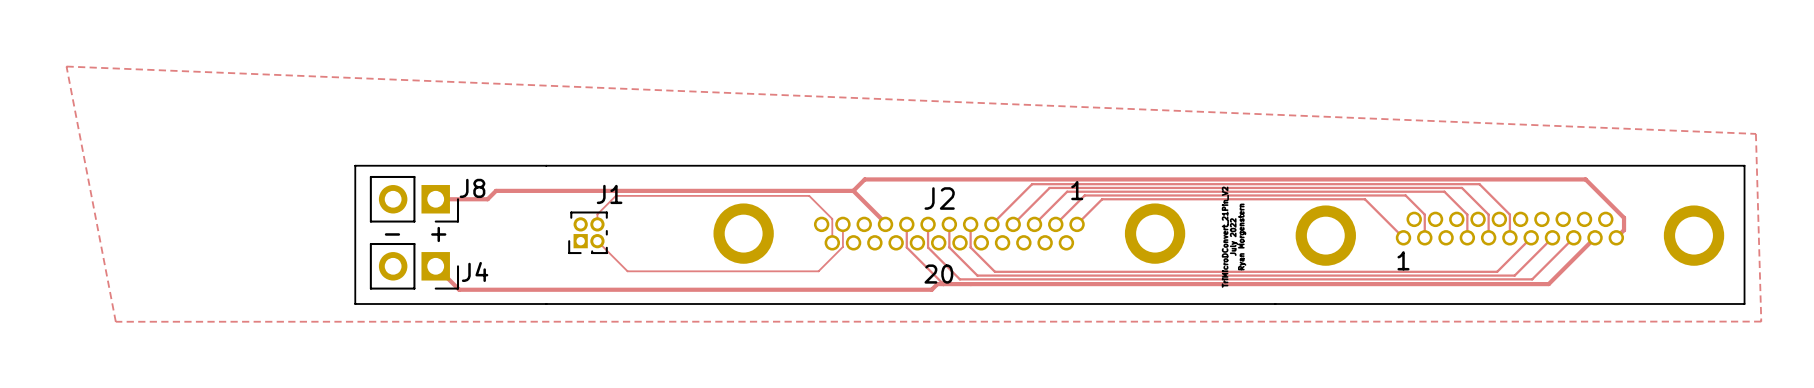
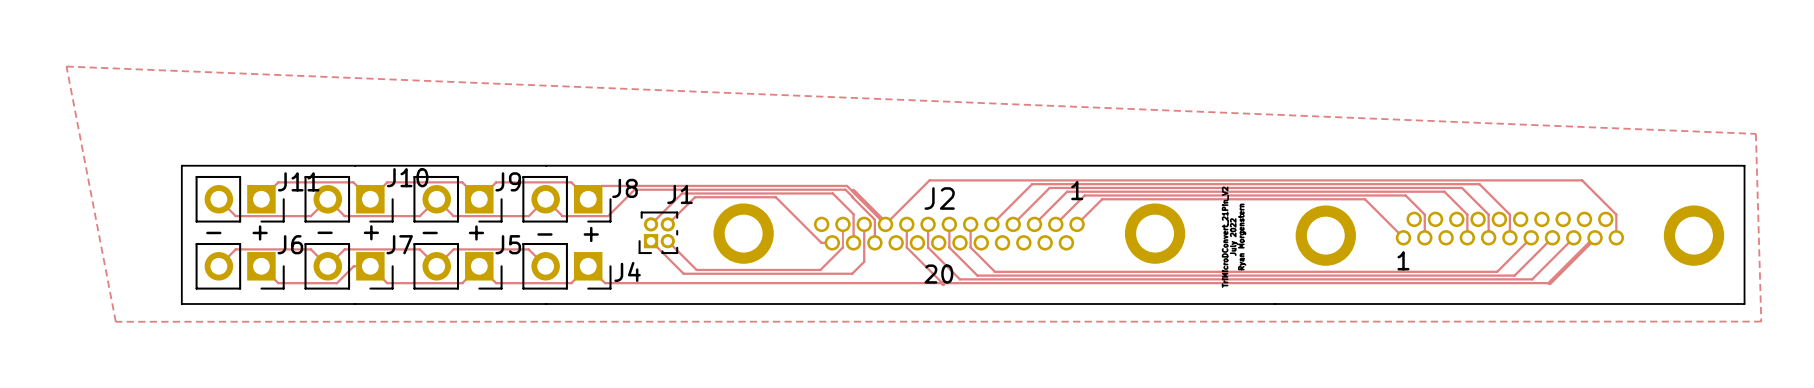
board edge: (355, 165) (355, 303) -> (355, 165) (181, 165) (181, 303) (355, 303)
track: none -> (218, 199) (235, 216) (310, 216) (327, 199) (344, 216) (419, 216) (436, 199) (453, 216) (528, 216) (545, 199) (562, 216) (608, 216) (634, 189) (845, 189) (874, 219) (874, 242)
J11: none -> (240, 199)
J10: none -> (349, 199)
J8 position: (414, 199) -> (566, 199)
track: (435, 199) (487, 199) (496, 190) (853, 190) (864, 179) (1585, 179) (1624, 217) (1624, 230) (1616, 237) -> (261, 199) (278, 182) (353, 182) (370, 199) (387, 182) (462, 182) (479, 199) (496, 182) (571, 182) (588, 199) (601, 185) (847, 185) (885, 224) (929, 180) (1582, 180) (1616, 214) (1616, 237)
J9: none -> (458, 199)
track: (597, 224) (597, 214) (615, 195) (809, 195) (832, 218) (832, 242) -> (667, 224) (694, 197) (775, 197) (821, 242) (832, 242)
track: none -> (651, 224) (681, 193) (832, 193) (853, 214) (853, 242)
track: none -> (864, 224) (864, 261) (852, 273) (683, 273) (651, 241)
text: none -> - + (236, 232)
text: none -> - + (348, 232)
text: none -> - + (453, 232)
J1 position: (588, 232) -> (658, 232)
text: - + (415, 234) -> none
text: none -> - + (568, 234)
track: (597, 241) (627, 271) (818, 271) (842, 246) -> (667, 241) (696, 269) (820, 269) (842, 246)
track: none -> (218, 266) (235, 249) (310, 249) (327, 266) (344, 249) (419, 249) (436, 266) (453, 249) (528, 249) (545, 266)
J6: none -> (240, 266)
J7: none -> (349, 266)
J4 position: (414, 266) -> (566, 266)
track: (435, 266) (459, 289) (931, 289) (937, 284) (1549, 283) -> (261, 266) (278, 283) (336, 283) (353, 266) (370, 266) (387, 283) (462, 283) (479, 266) (496, 283) (571, 283) (588, 266) (605, 283) (1549, 283)
J5: none -> (458, 266)

